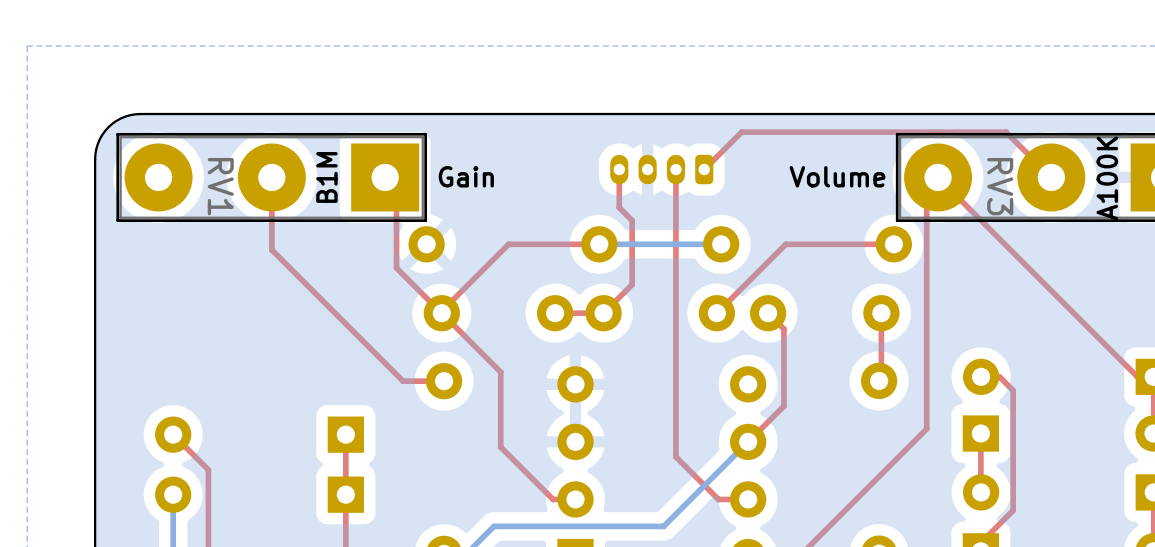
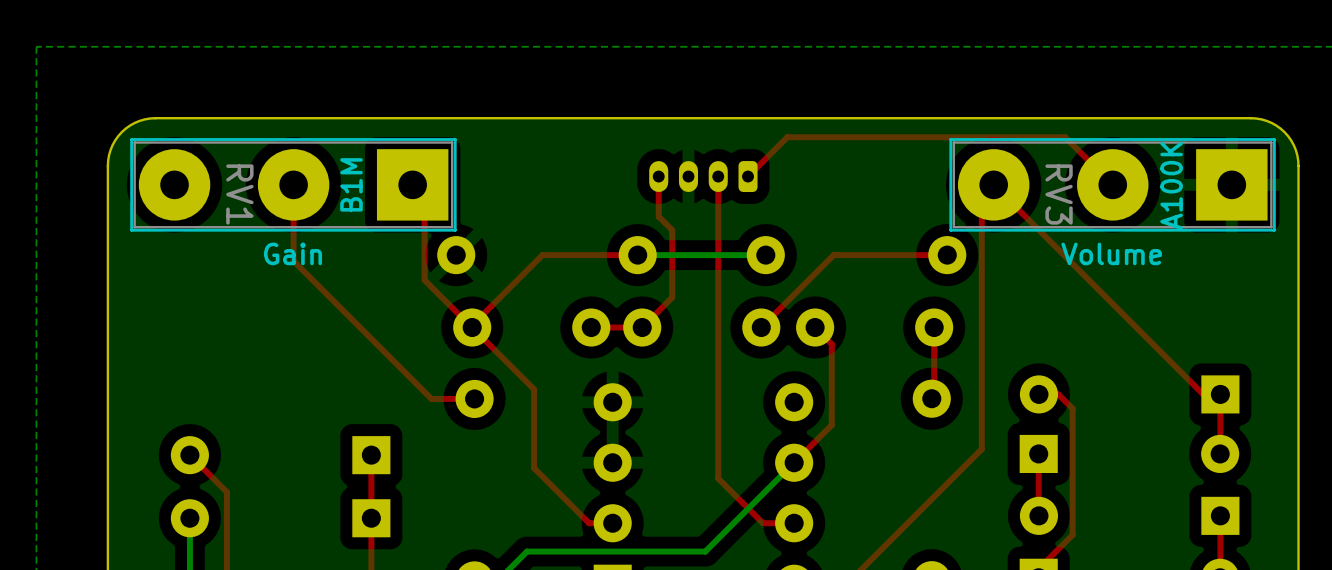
RV1 text position: Gain (466, 176) -> Gain (292, 253)
RV3 text position: Volume (837, 176) -> Volume (1111, 253)

